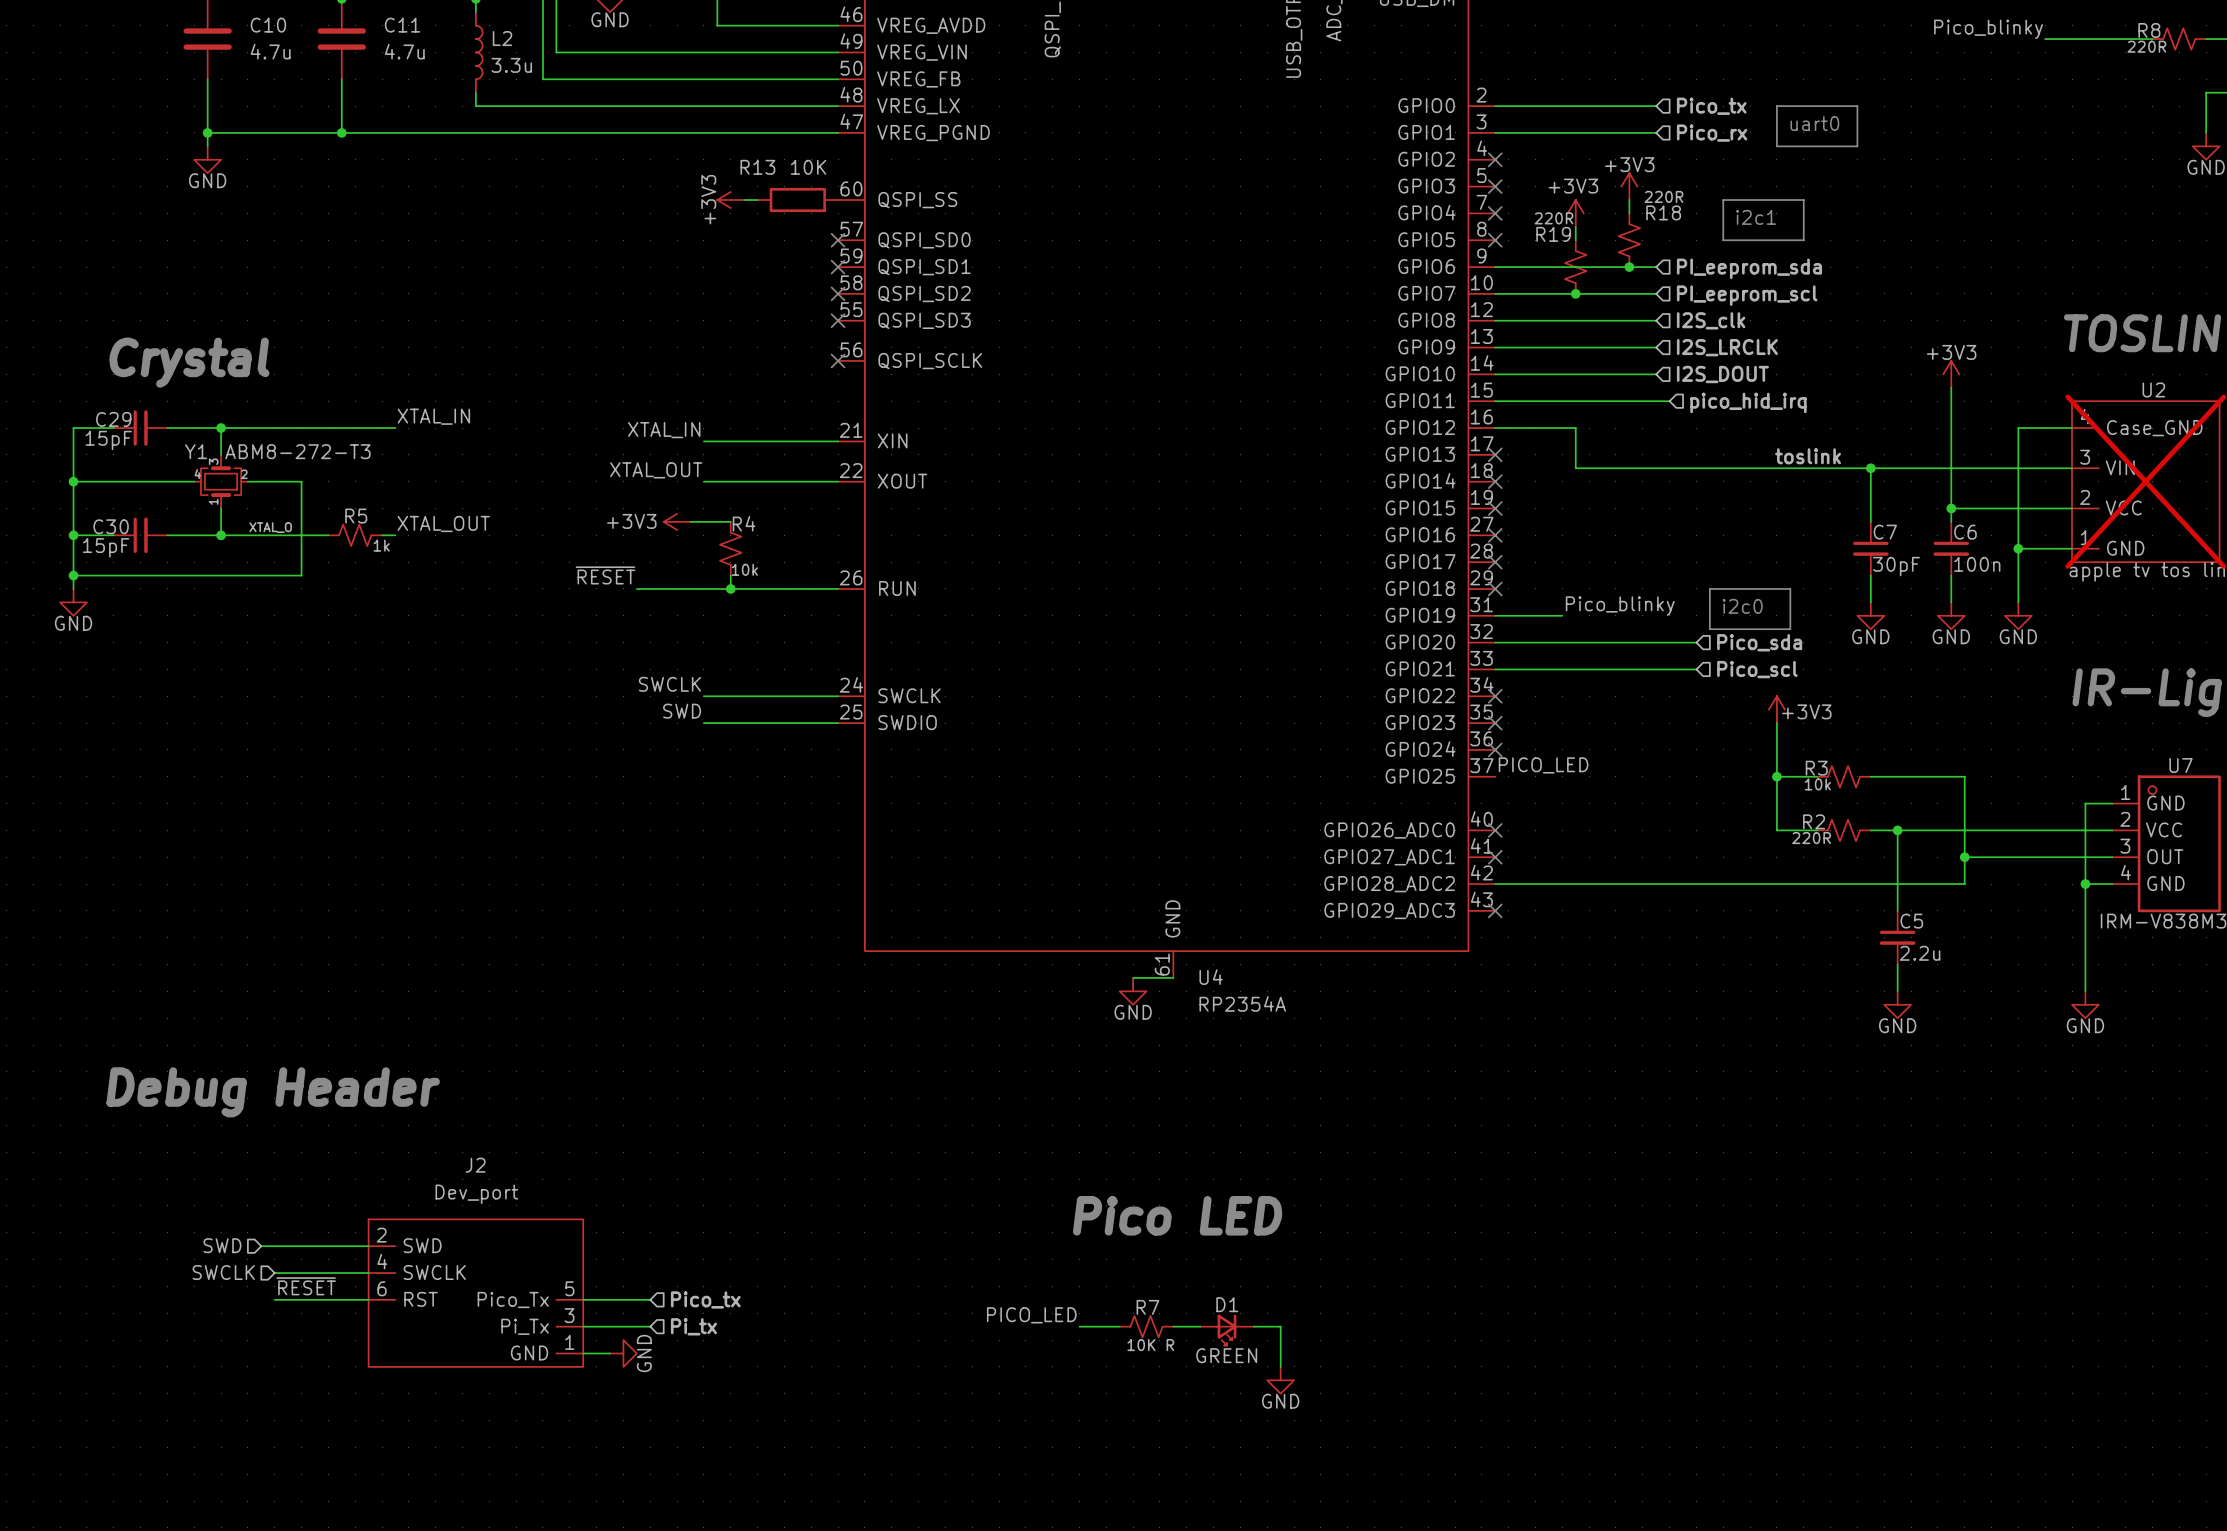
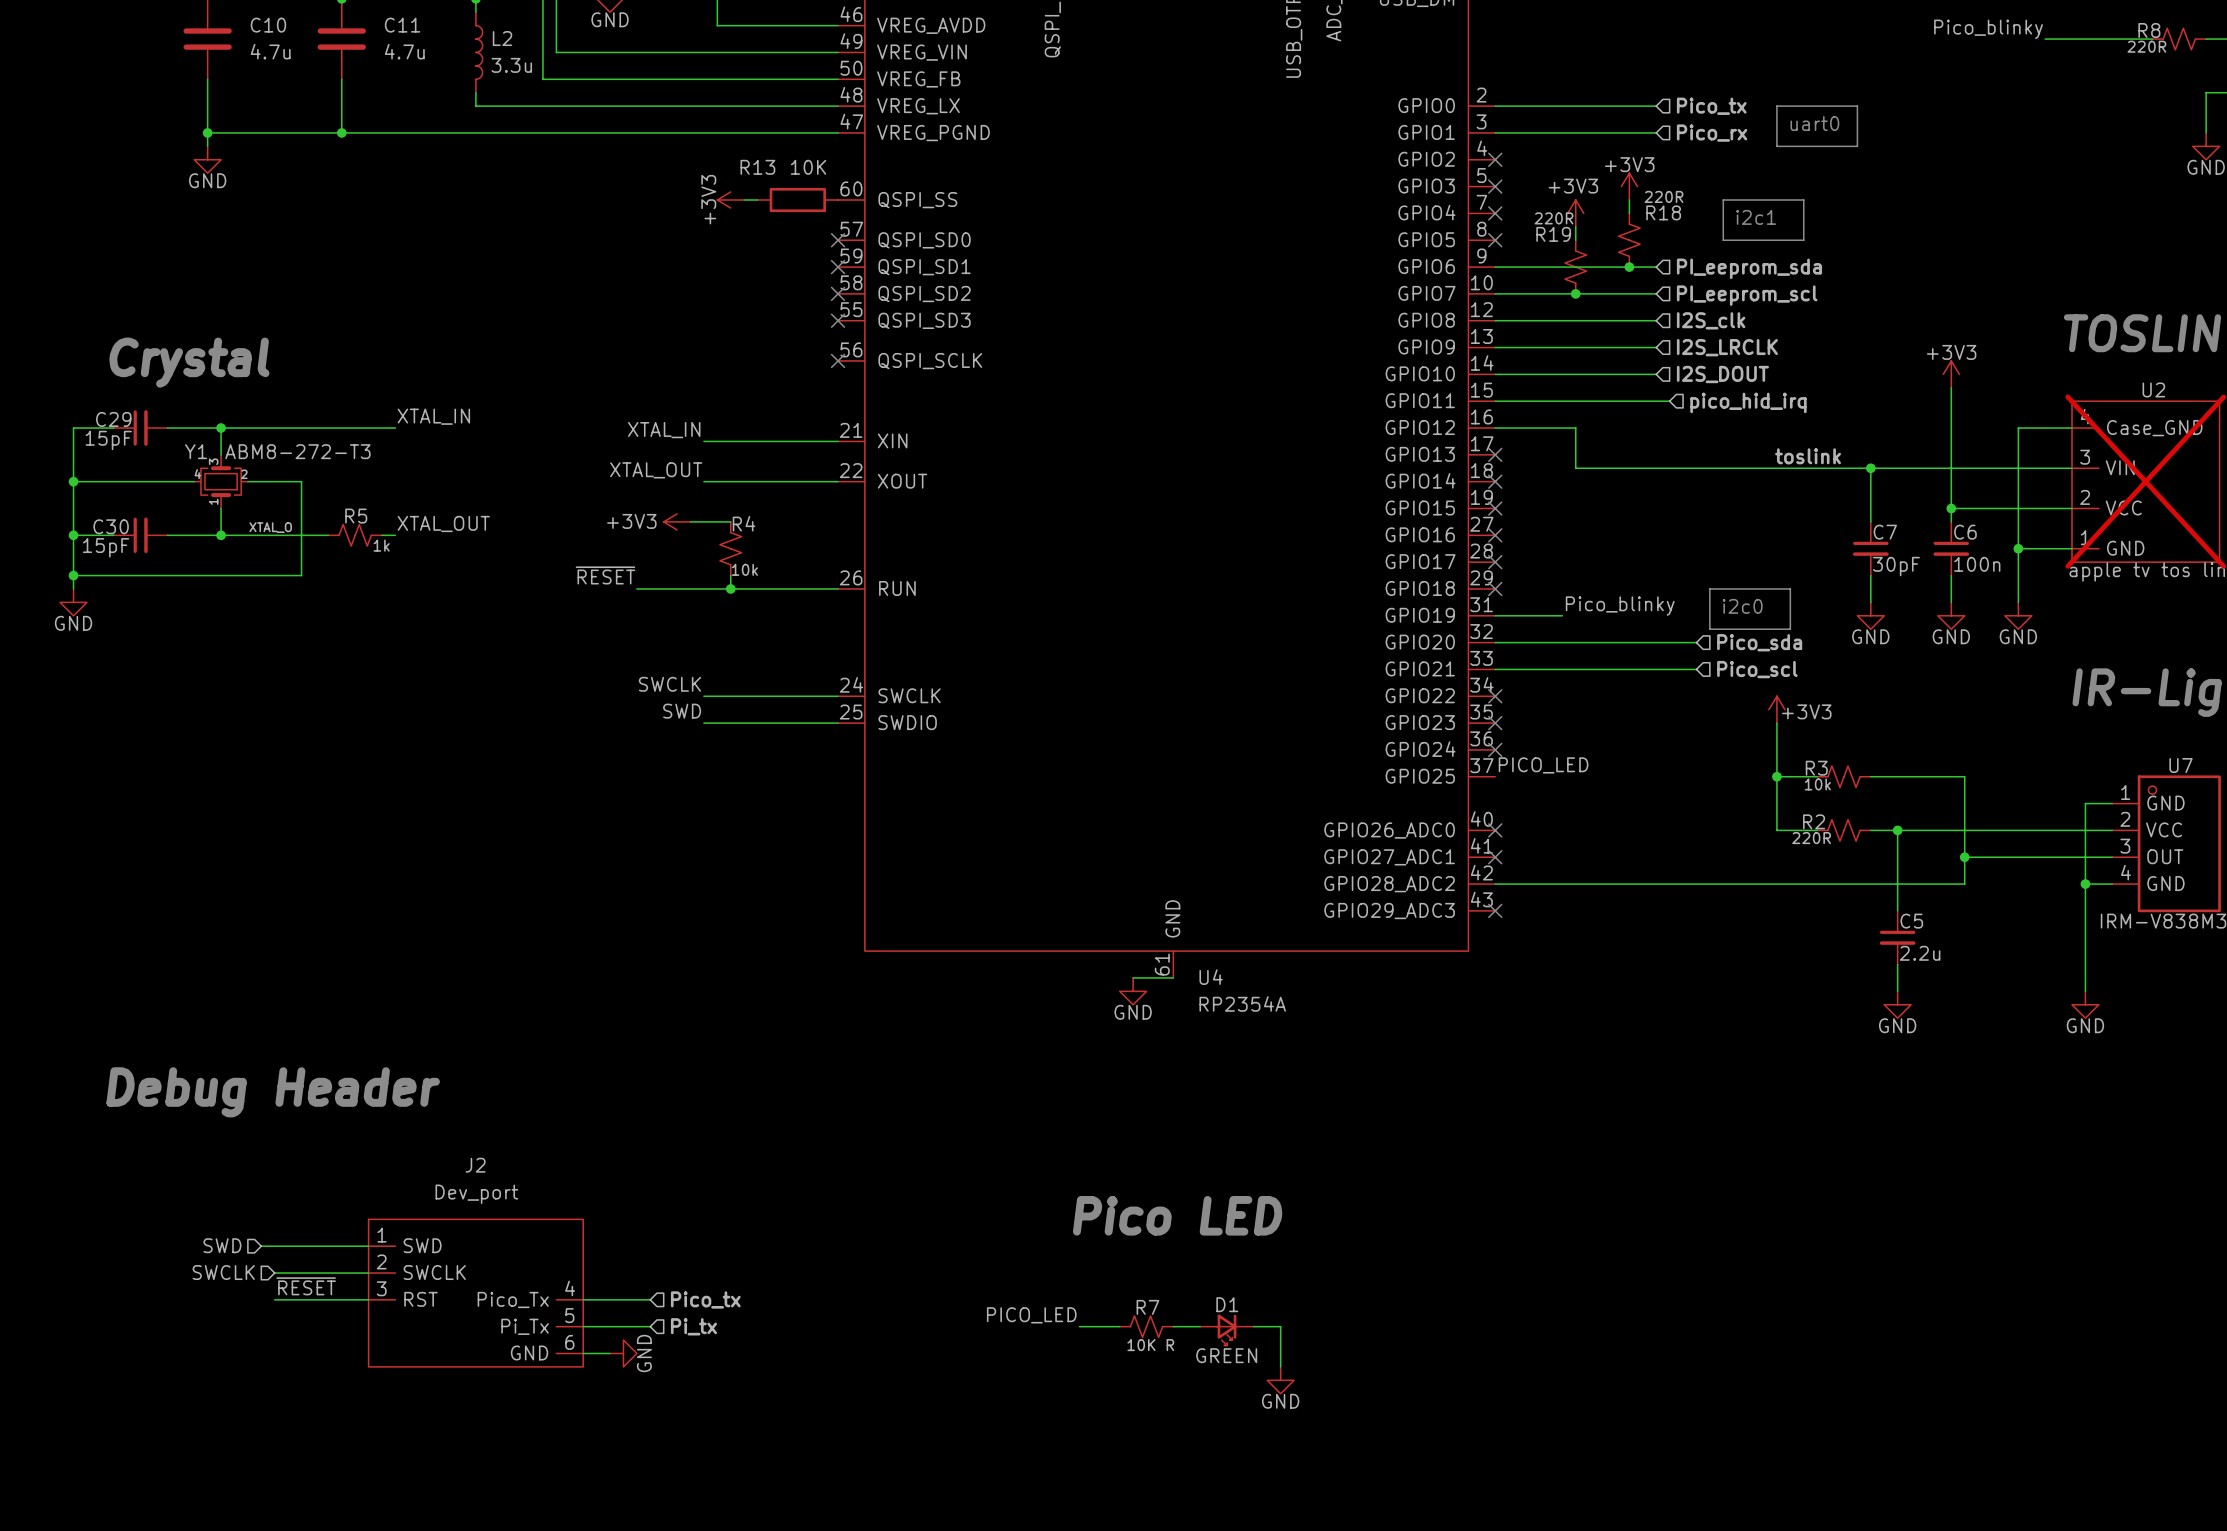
J2 pin number: 2 (381, 1235) -> 1 (382, 1235)
J2 pin number: 4 (382, 1261) -> 2 (381, 1261)
J2 pin number: 6 (382, 1288) -> 3 (381, 1288)
J2 pin number: 5 (569, 1288) -> 4 (570, 1288)
J2 pin number: 3 (569, 1315) -> 5 (569, 1315)
J2 pin number: 1 (569, 1342) -> 6 (569, 1342)

